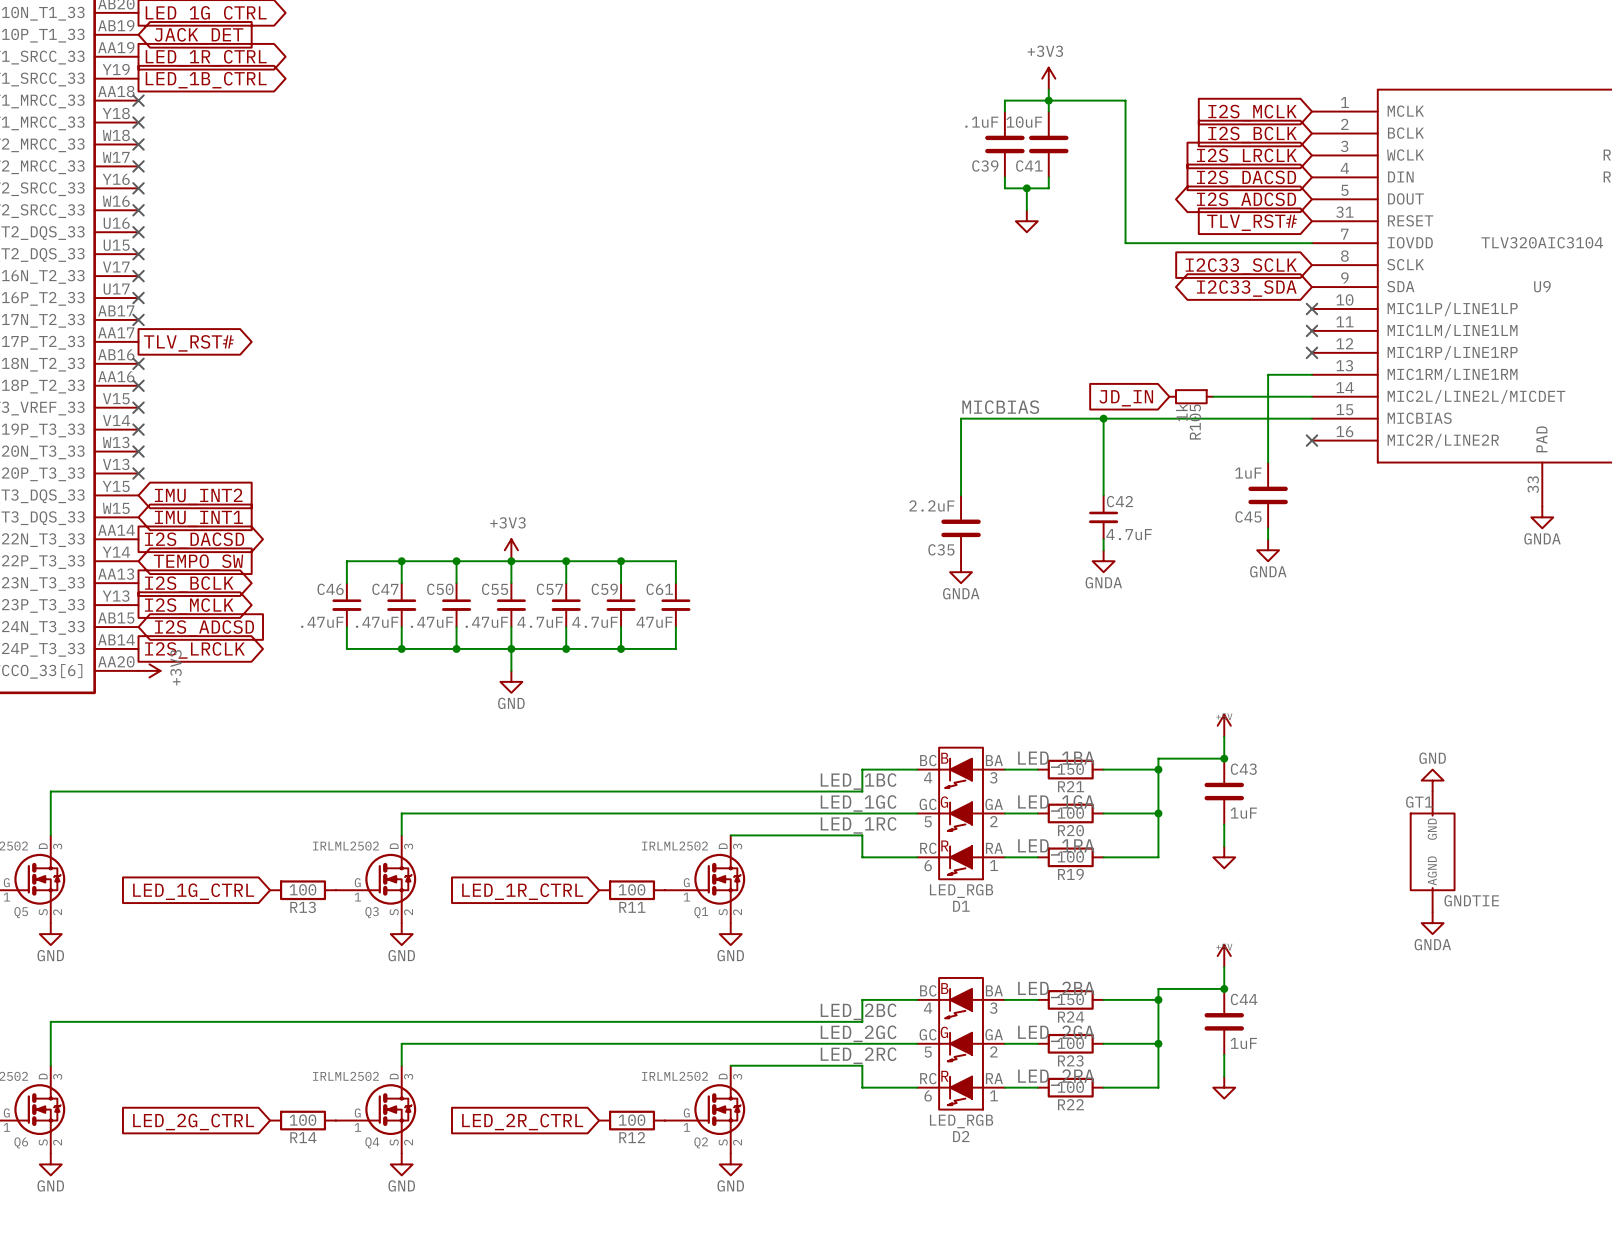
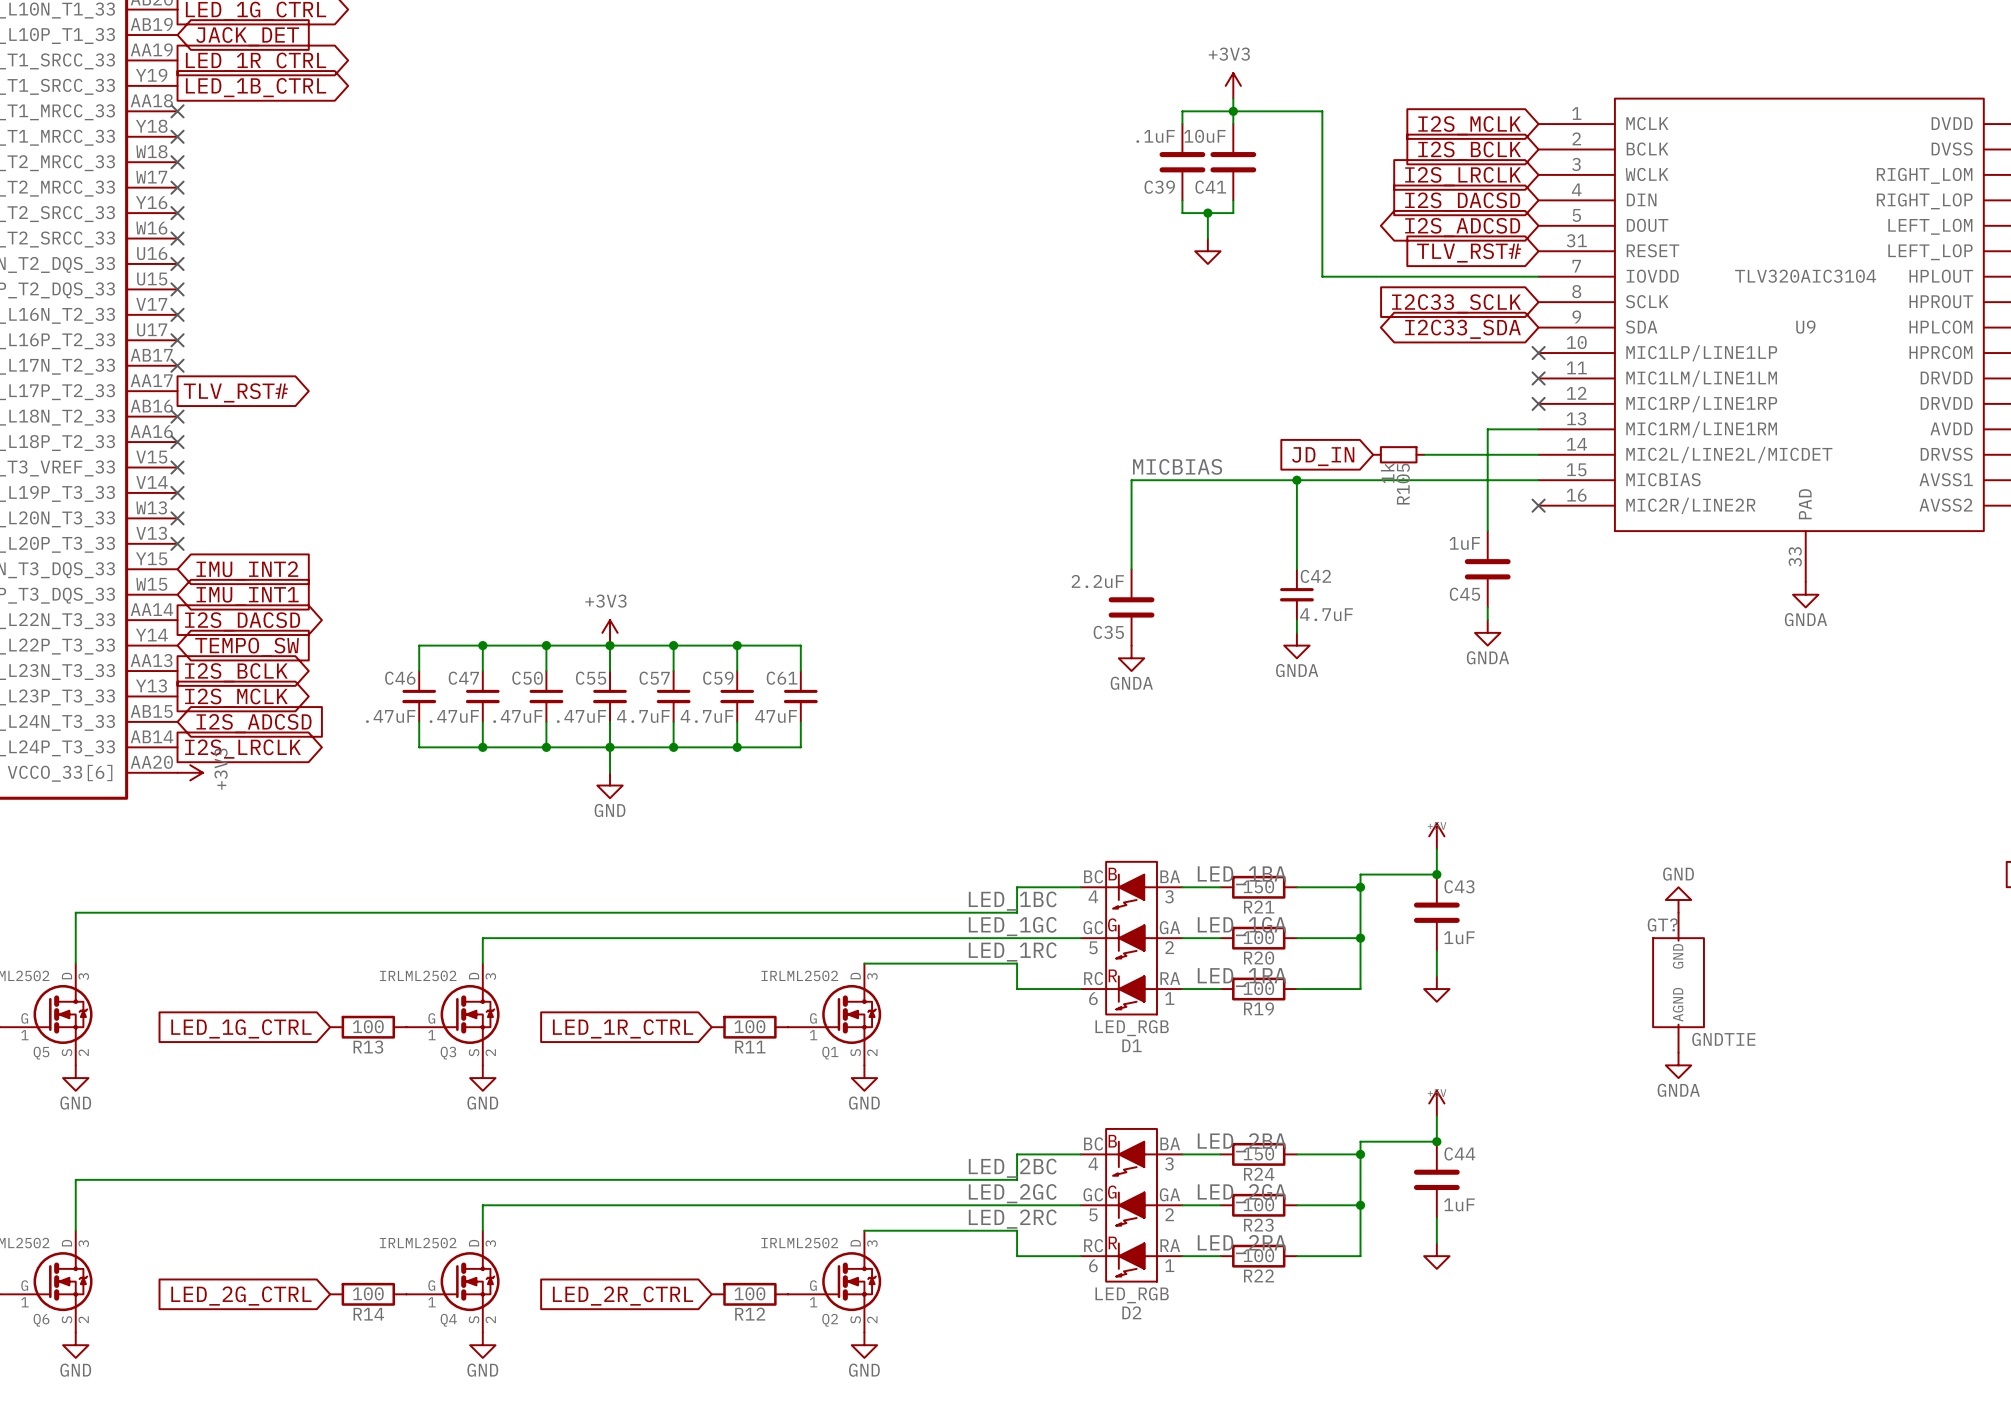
GT1 name: GT1 (1419, 802) -> GT? (1662, 924)

